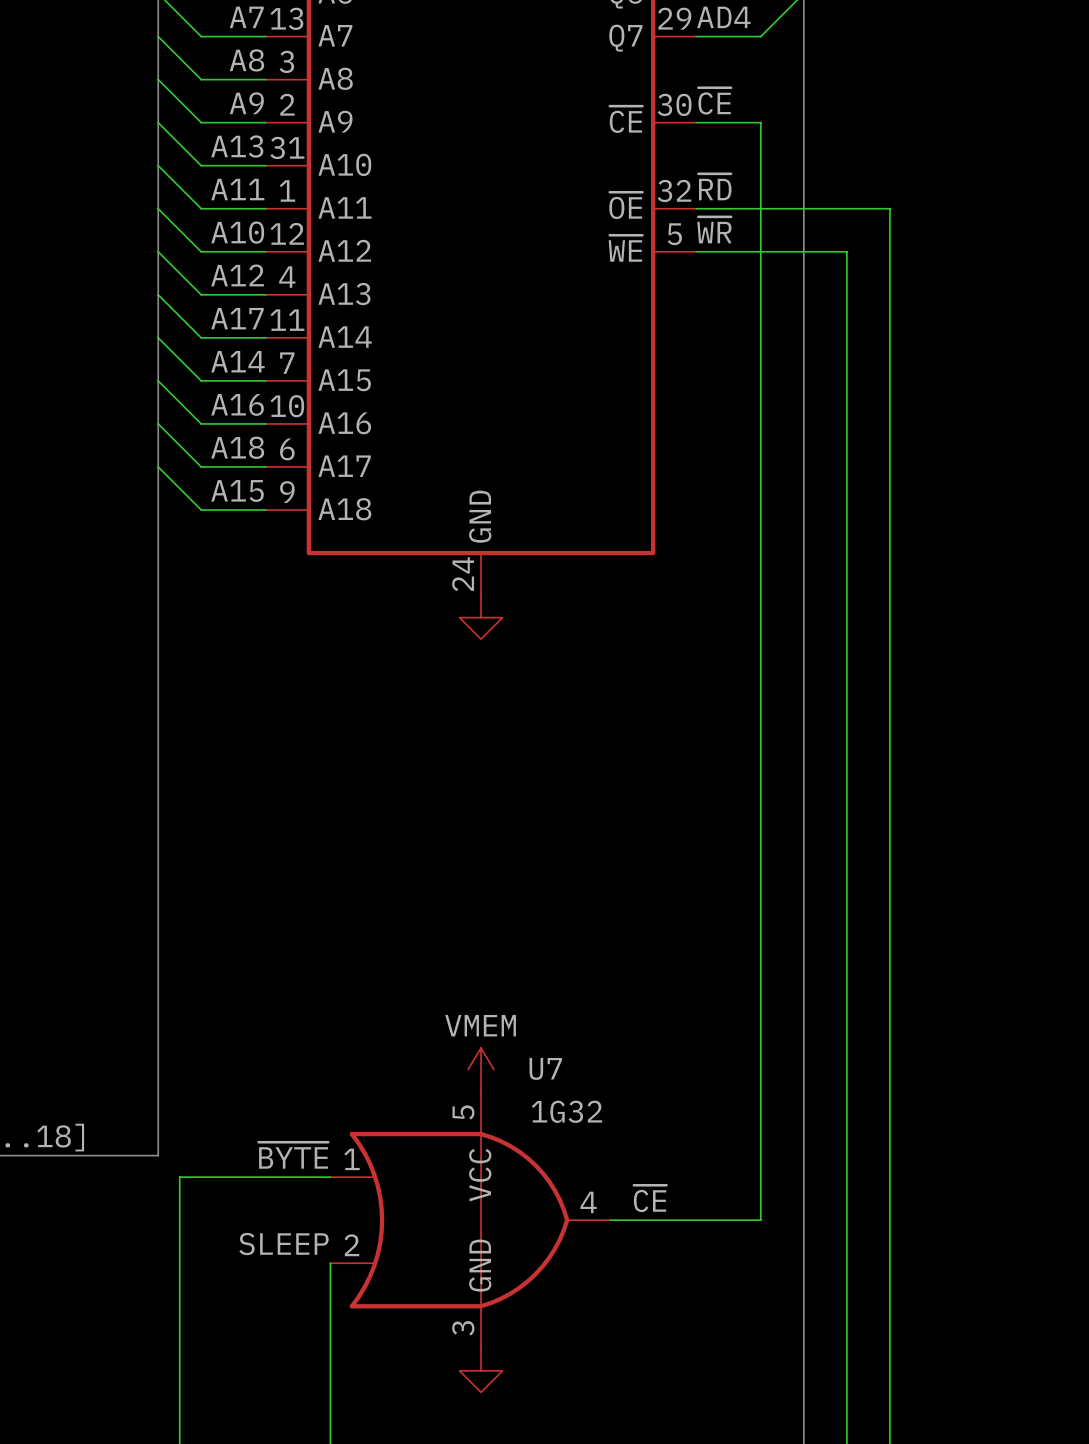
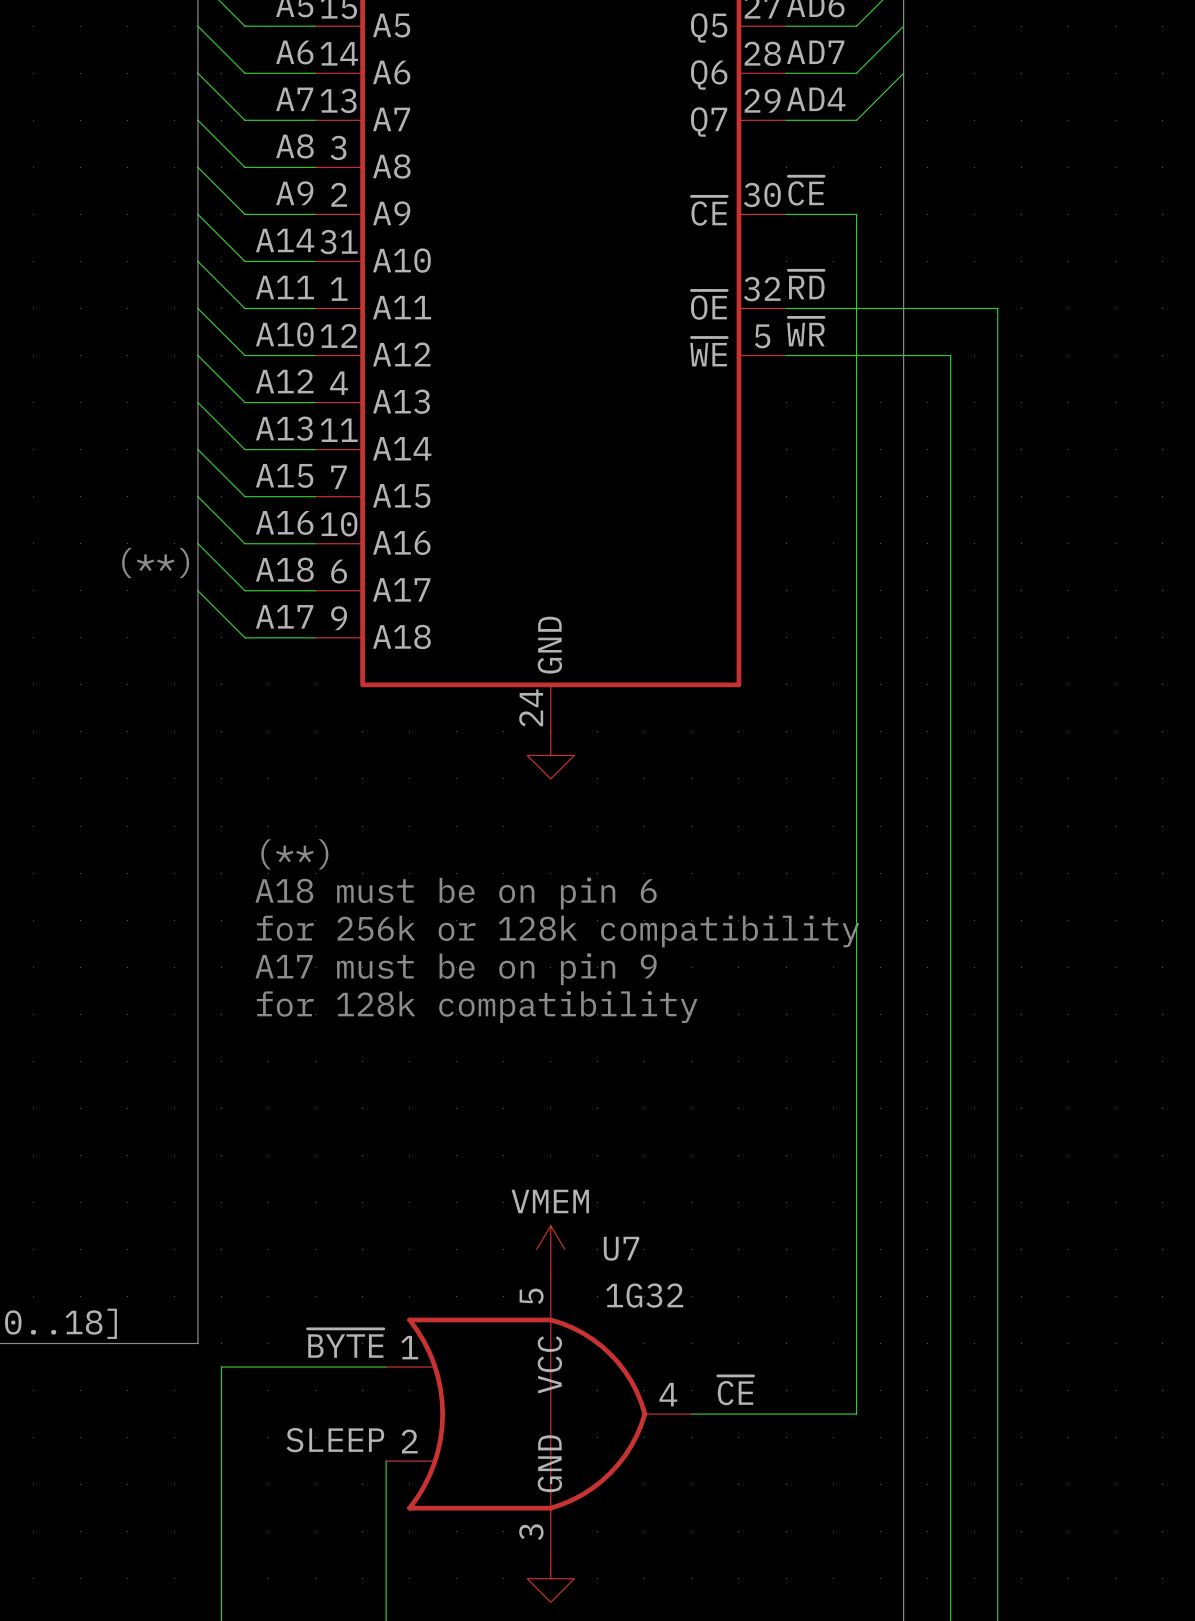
label: A13 (237, 146) -> A14 (285, 240)
label: A17 (237, 318) -> A13 (284, 428)
label: A14 (237, 361) -> A15 (284, 475)
text: none -> (**) (155, 563)
label: A15 (237, 491) -> A17 (284, 616)
text: none -> (**) (294, 854)
text: none -> A18 must be on pin 6 (456, 893)
text: none -> for 256k or 128k compatibility (558, 931)
text: none -> A17 must be on pin 9 (456, 969)
text: none -> for 128k compatibility (477, 1007)

